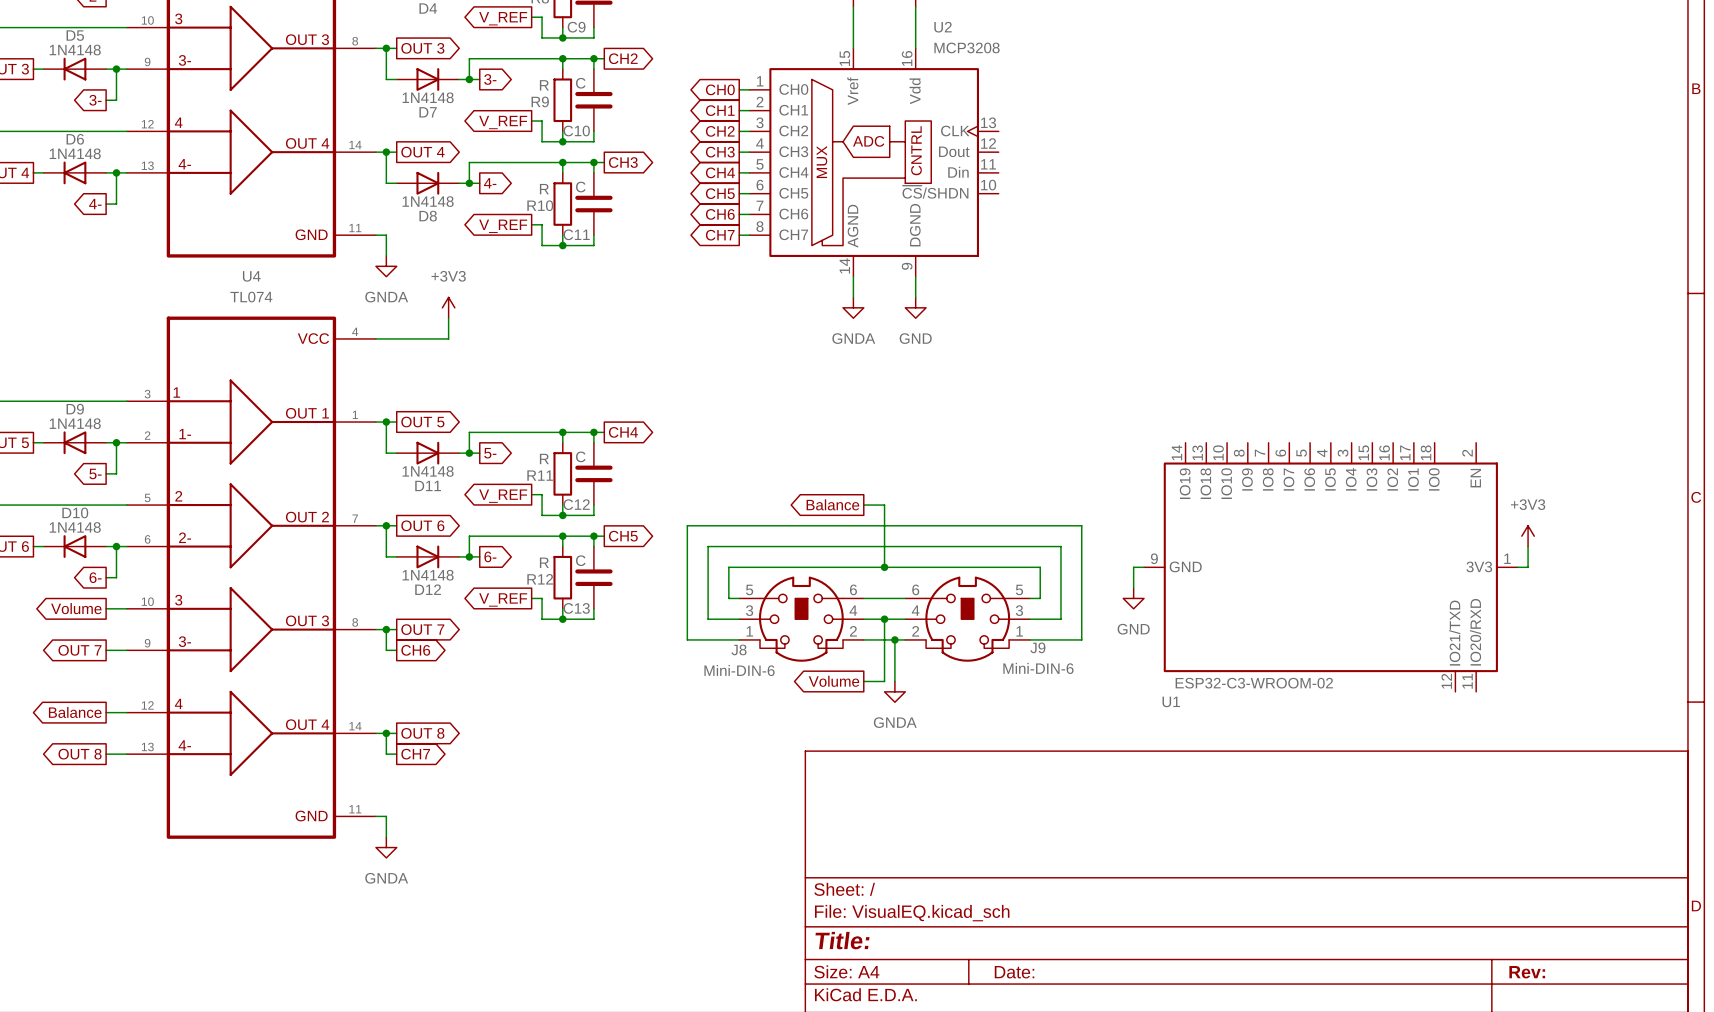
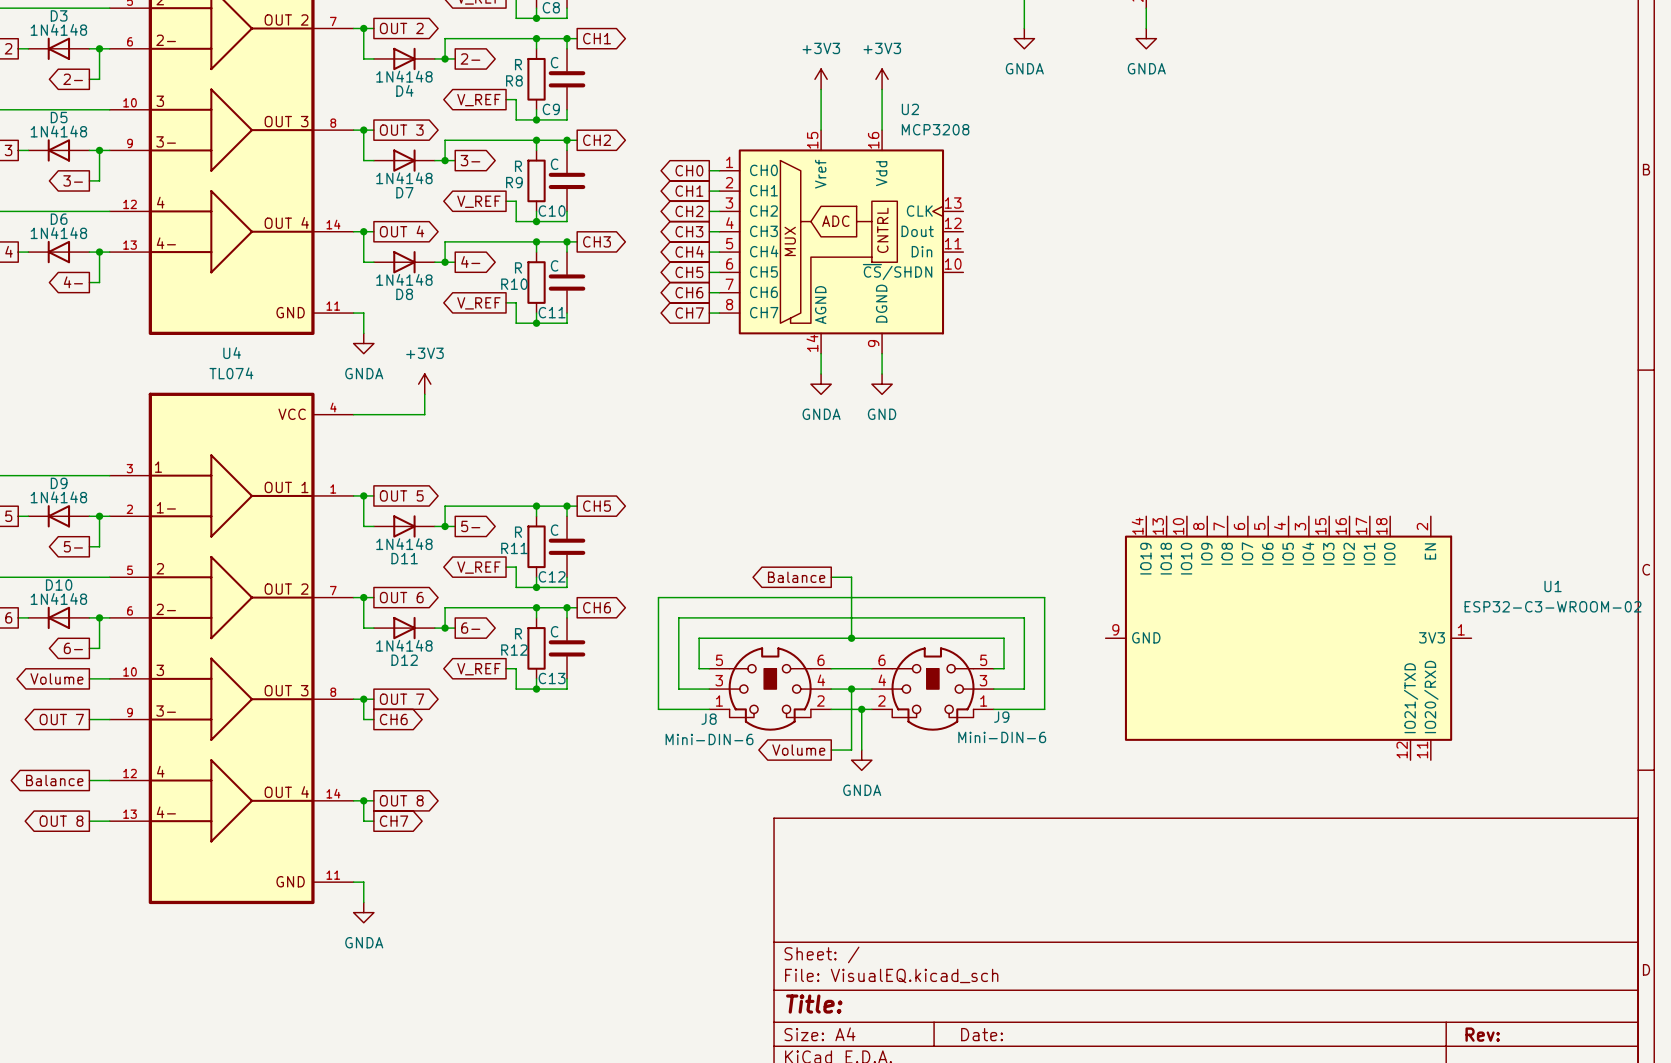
global label: CH4 (623, 432) -> CH5 (597, 506)
global label: CH5 (623, 536) -> CH6 (597, 607)
power symbol: +3V3 (1528, 536) -> none
wire: (1528, 546) (1528, 567) (1517, 567) -> none
wire: (1144, 567) (1133, 567) (1133, 588) -> none
power symbol: GND (1133, 598) -> none
U1 value position: ESP32-C3-WROOM-02 (1254, 683) -> ESP32-C3-WROOM-02 (1553, 606)
U1 name position: U1 (1171, 701) -> U1 (1553, 586)

